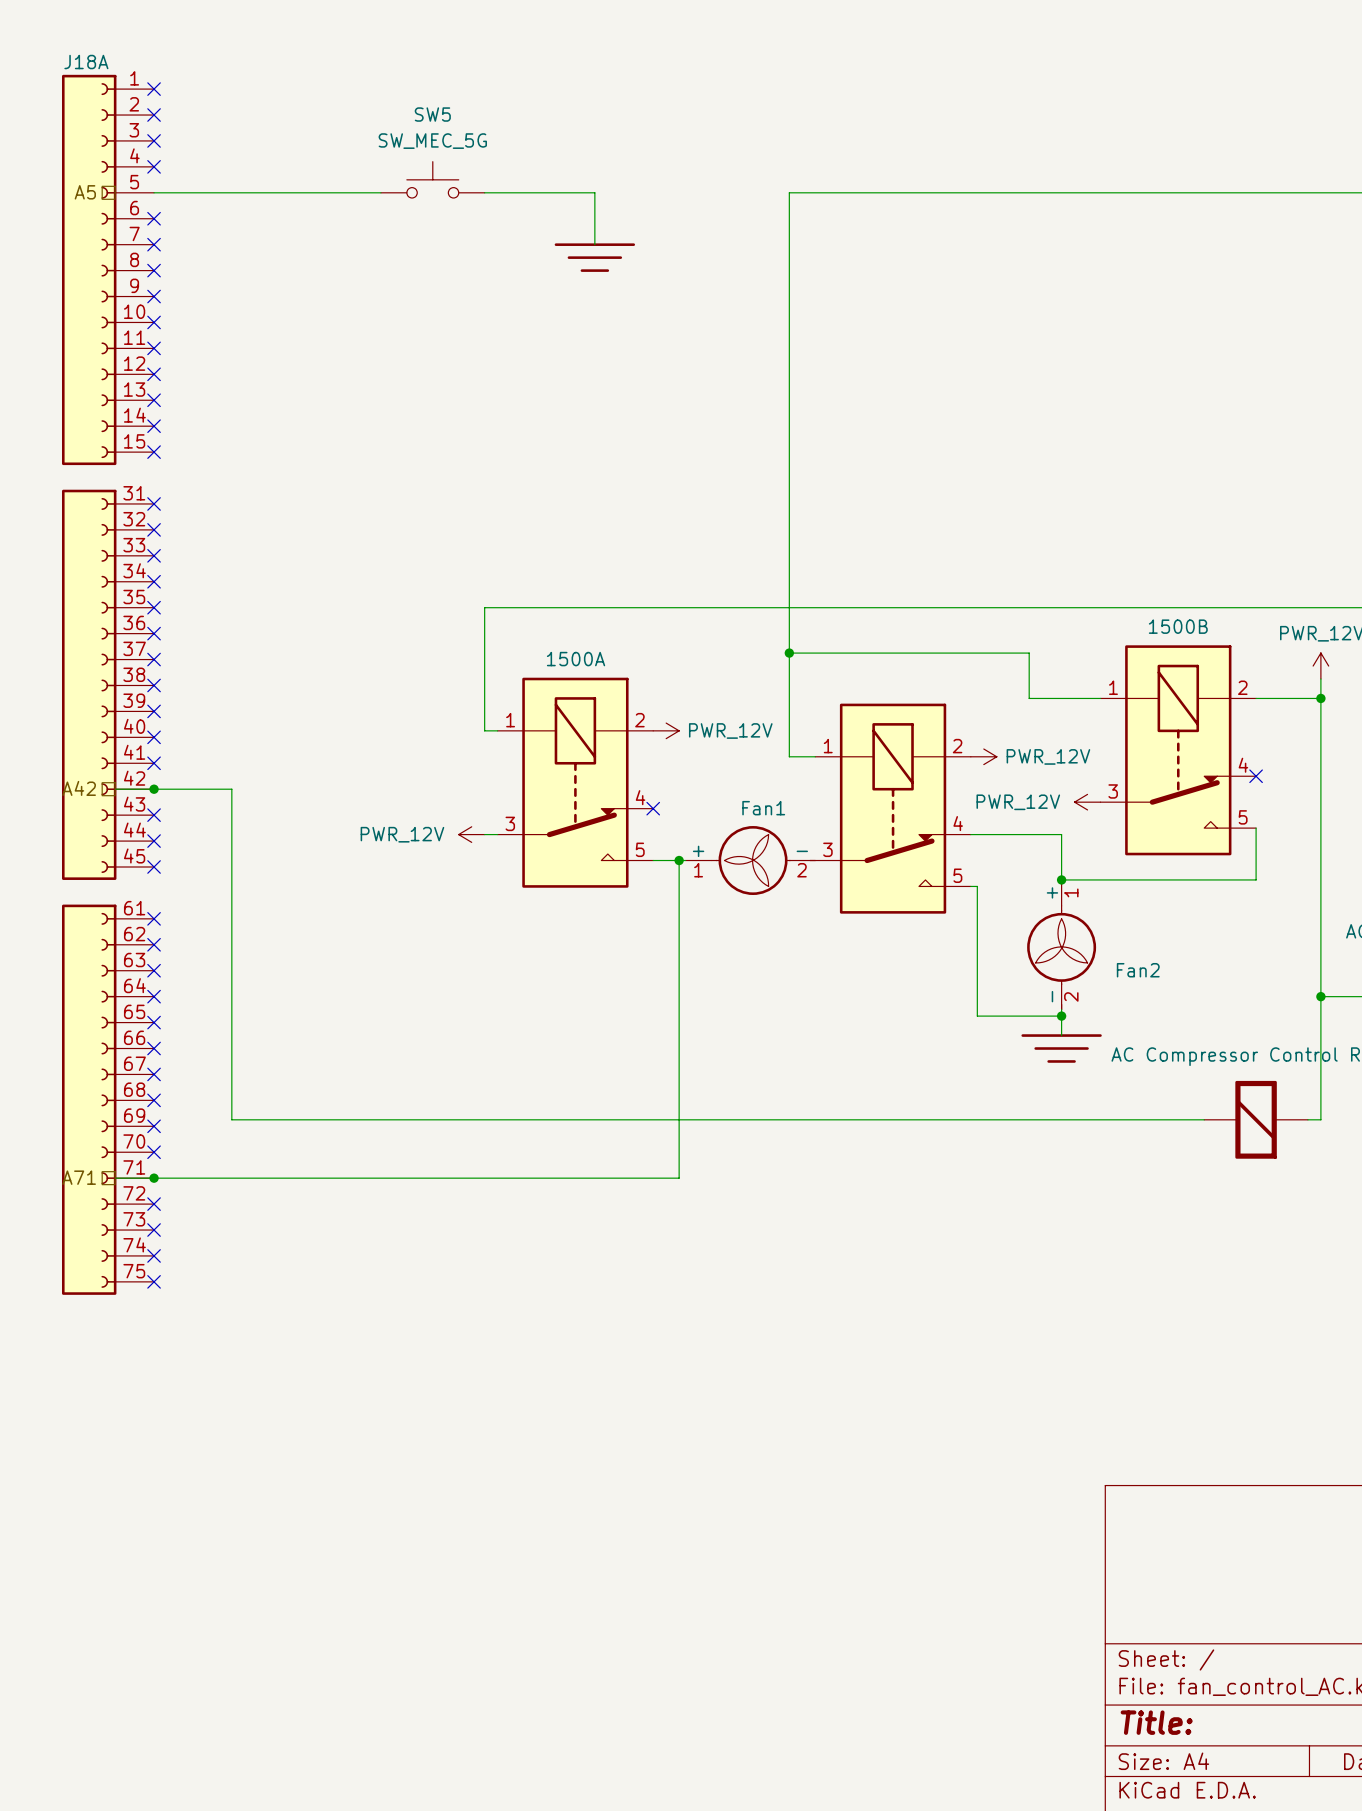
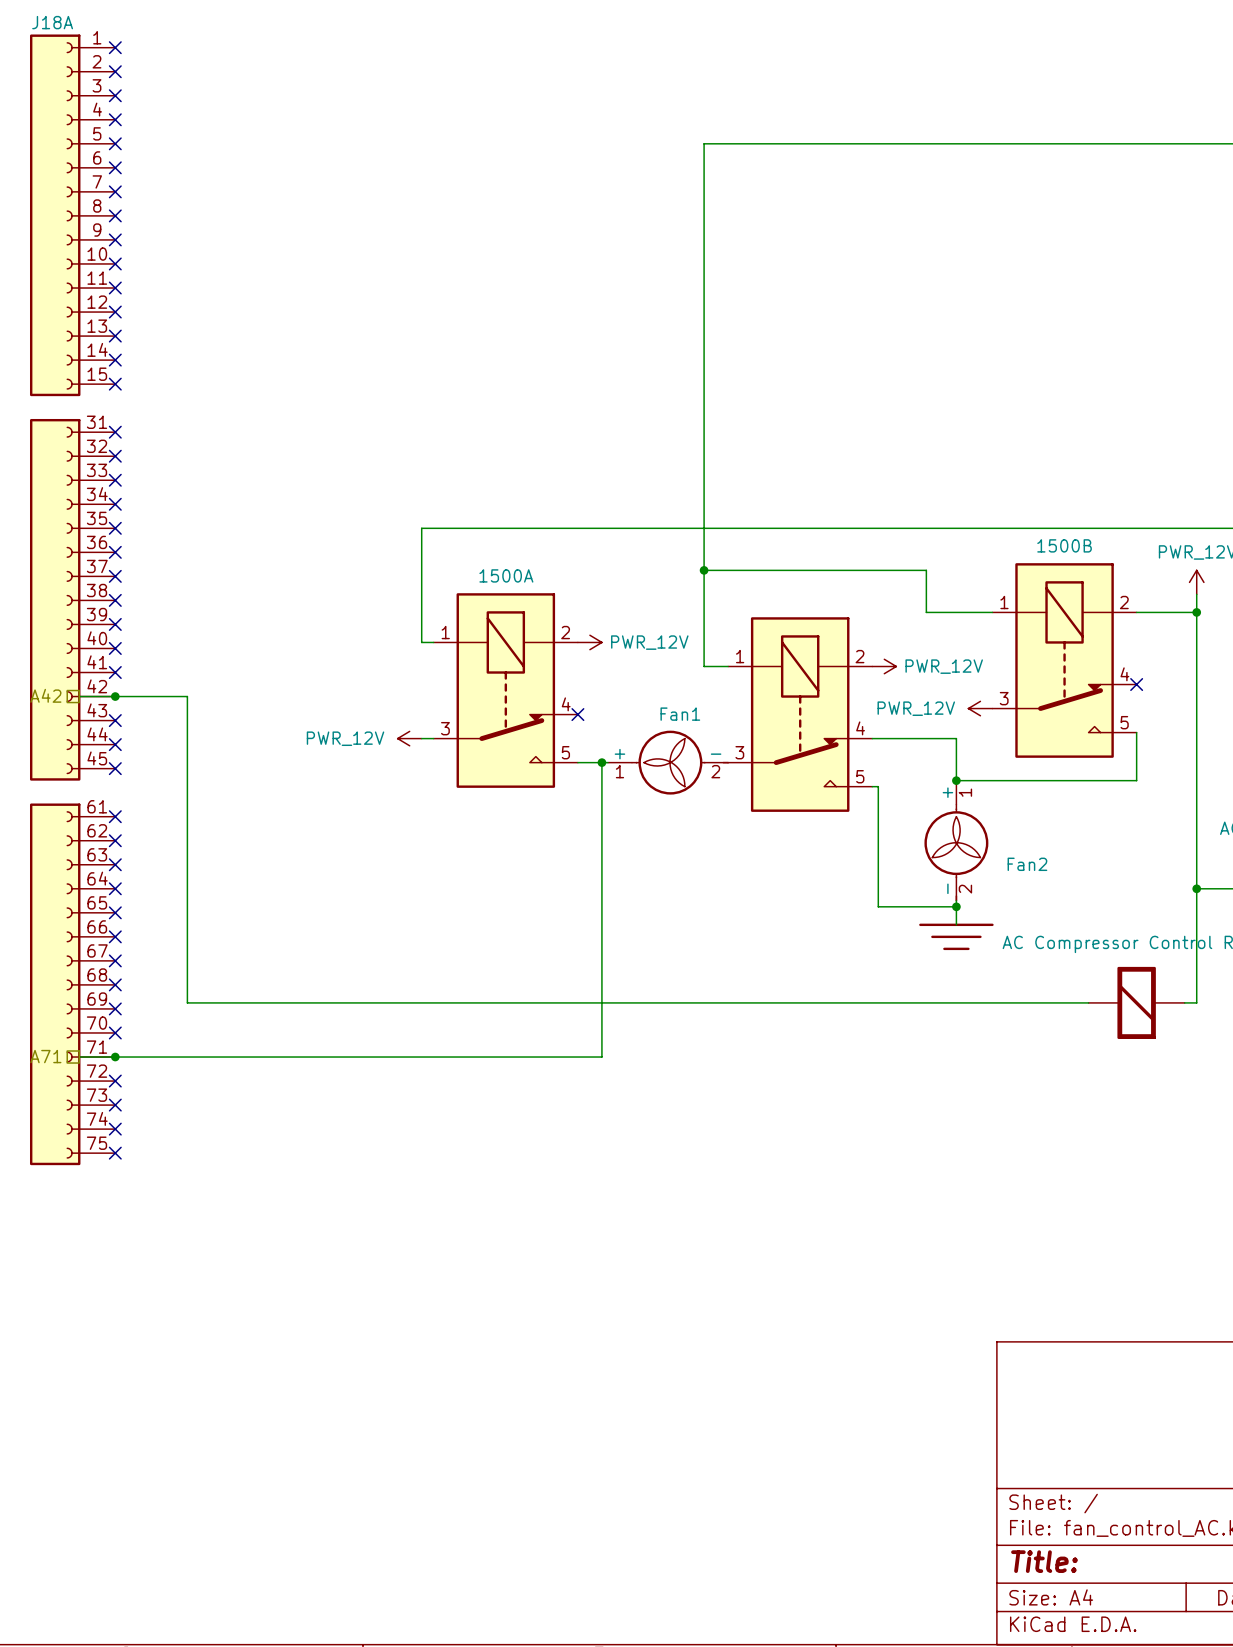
SW5: SW_MEC_5G (432, 179) -> none
hierarchical label: A5 (85, 192) -> none
wire: (154, 192) (380, 192) -> none
no-connect mark: none -> (115, 143)
wire: (484, 192) (594, 192) (594, 244) -> none
power symbol: (594, 257) -> none

